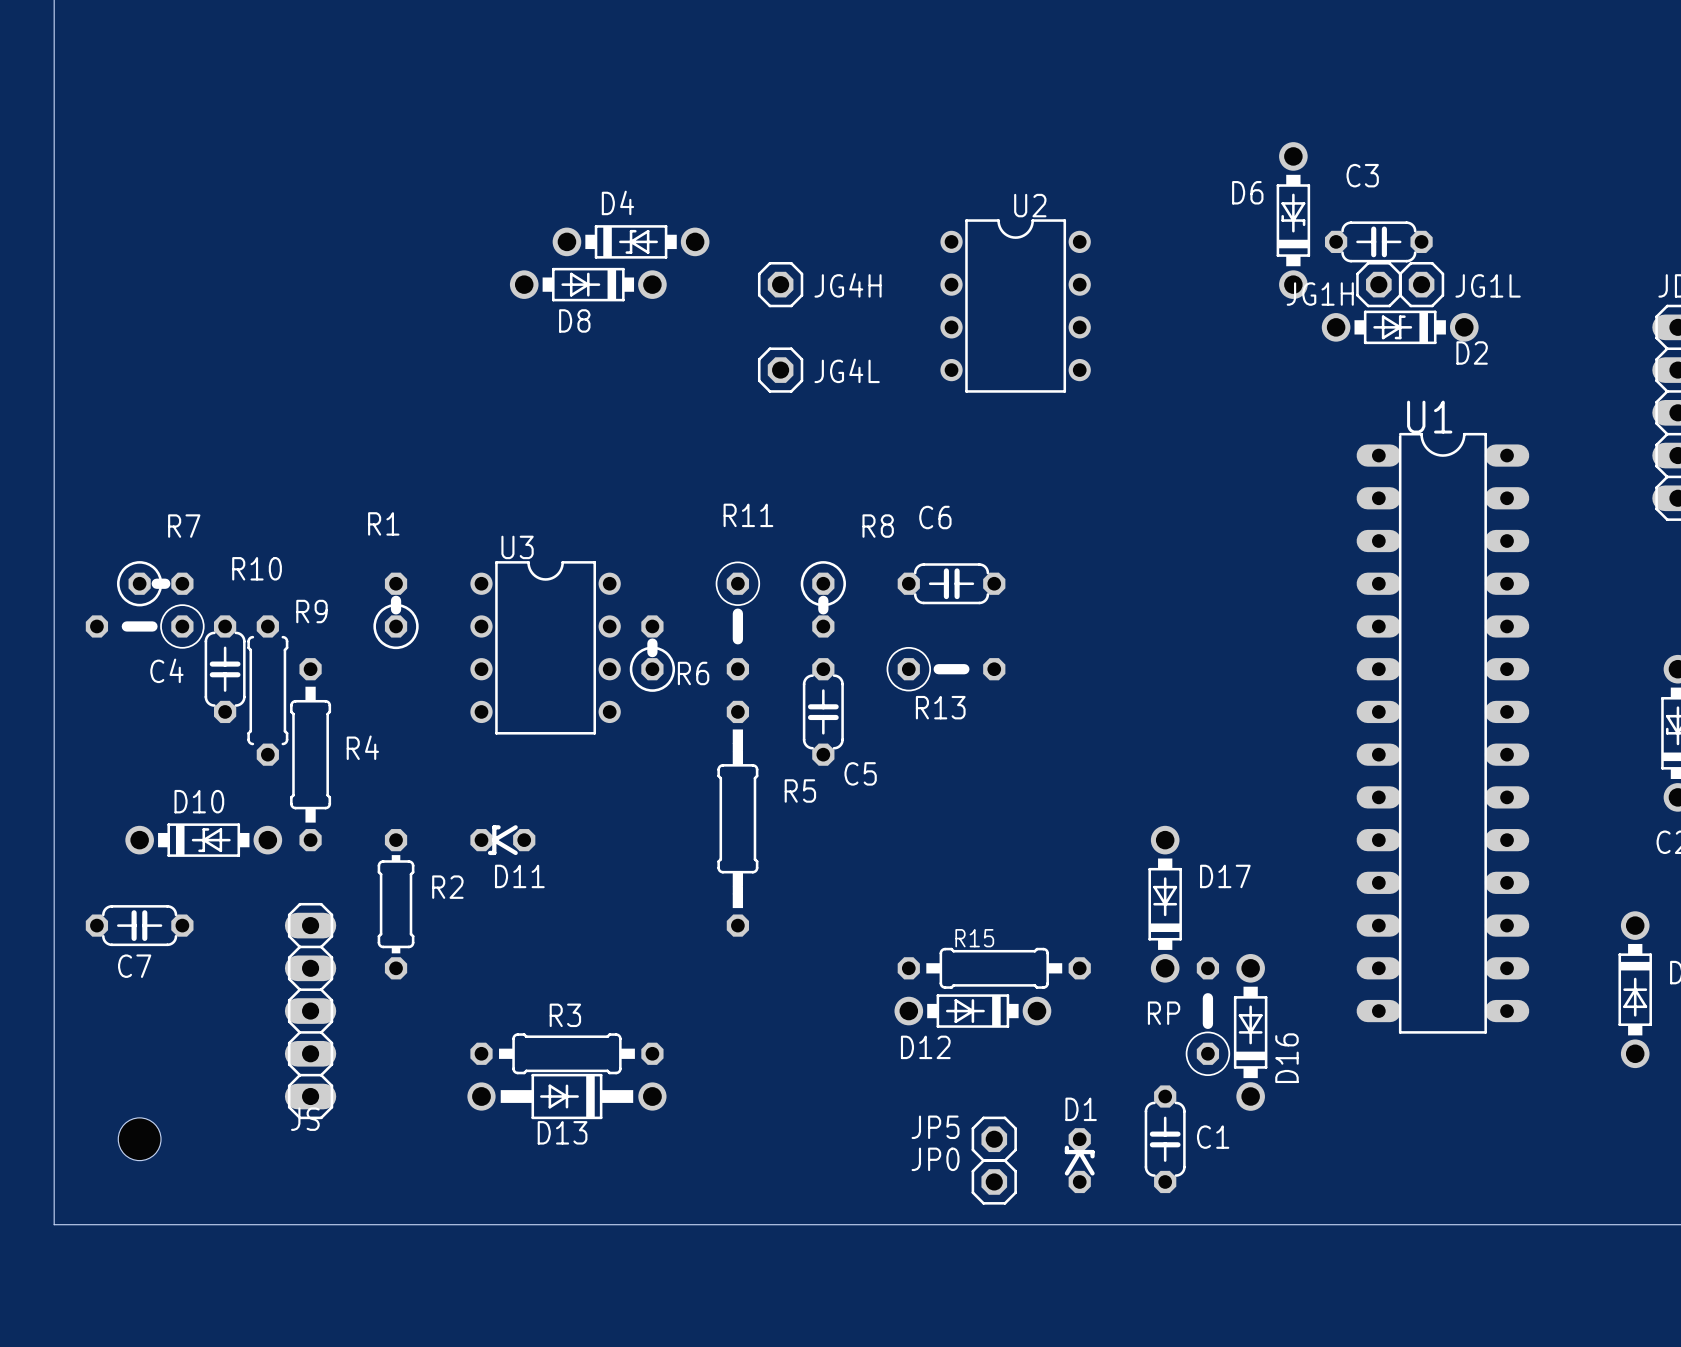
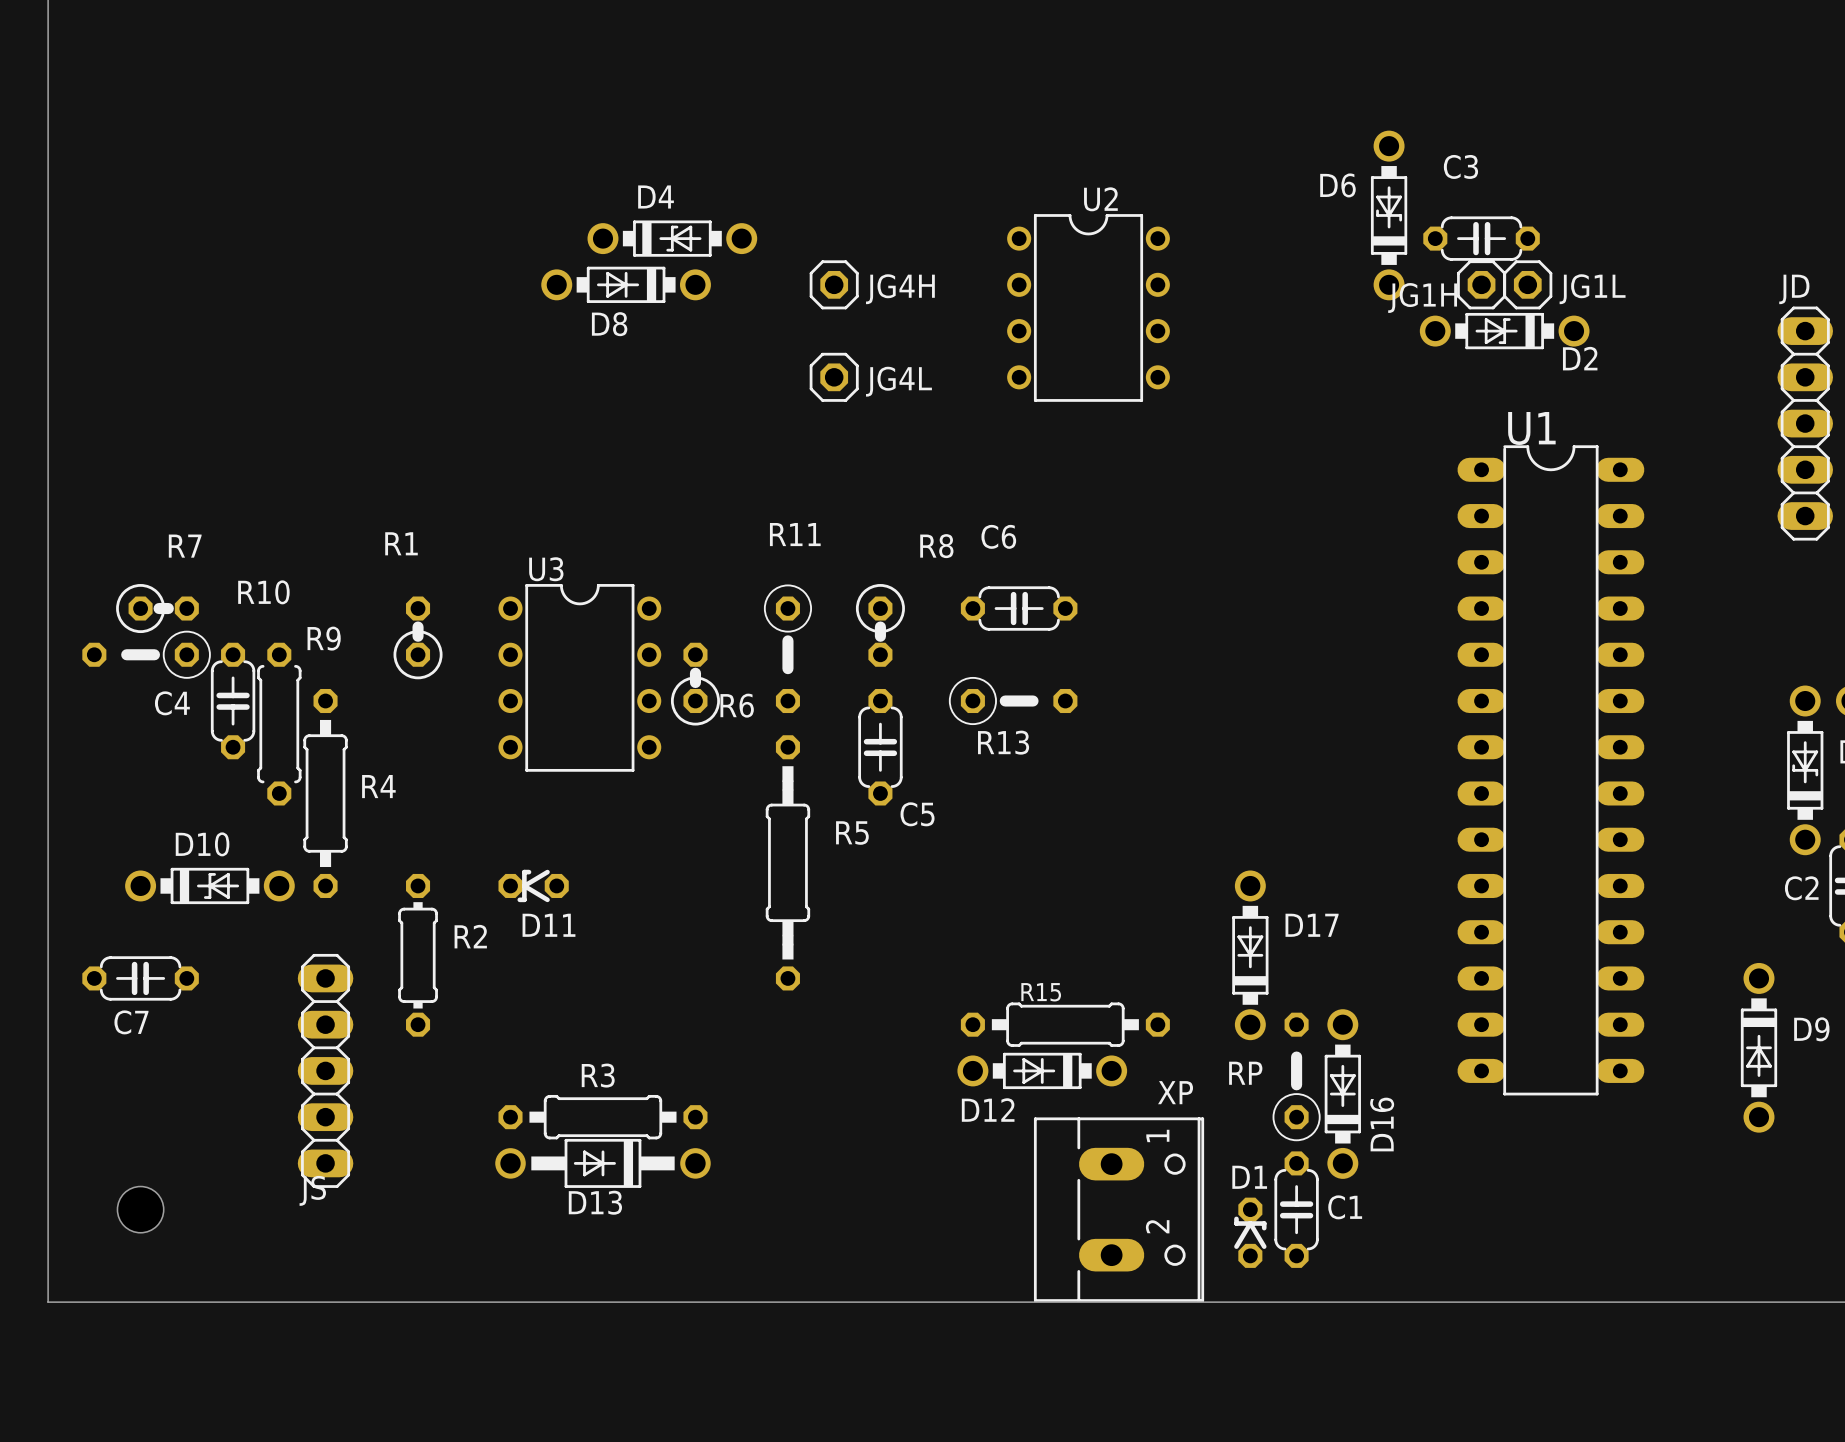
JP5: (994, 1139) -> none
XP: none -> (1119, 1209)
C1 position: (1165, 1139) -> (1296, 1209)
D1 position: (1079, 1160) -> (1250, 1232)
JP0: (994, 1181) -> none

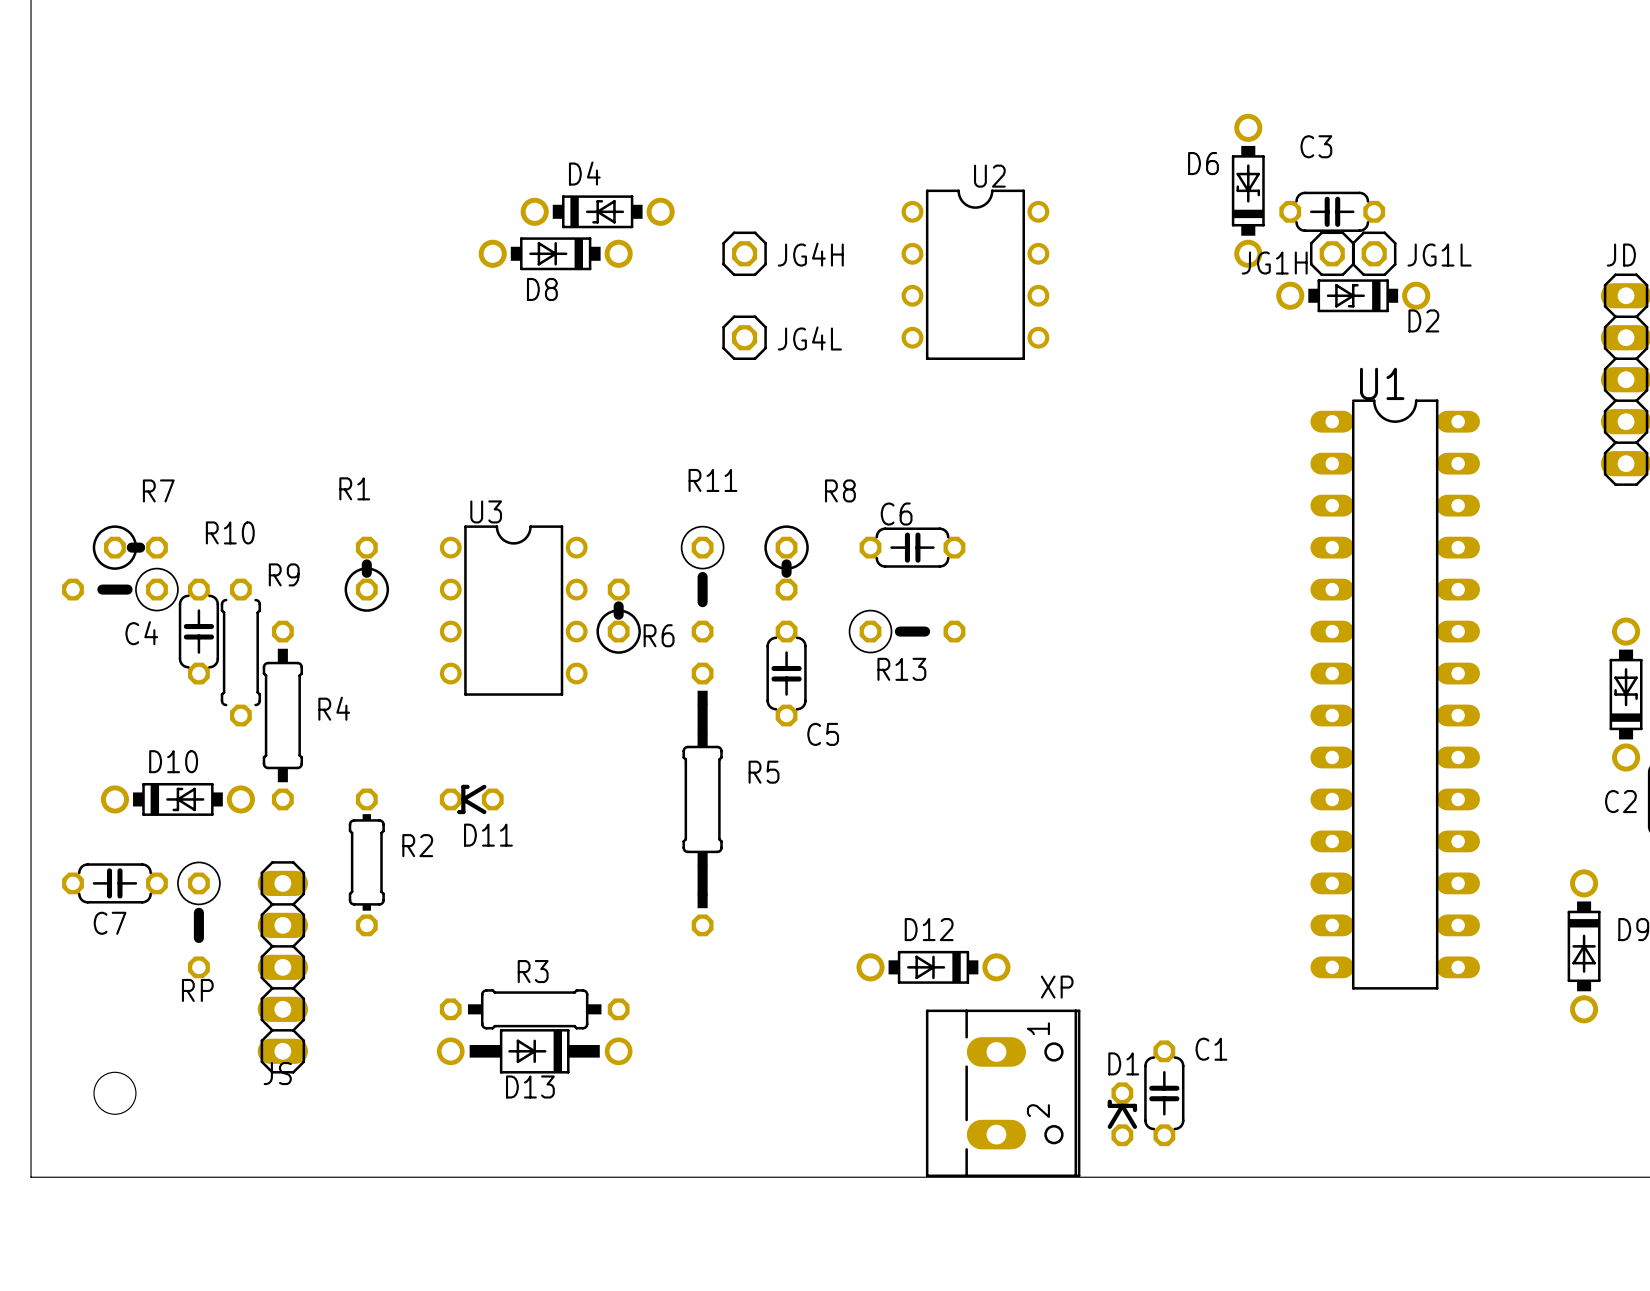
C6 name position: C6 (998, 536) -> C6 (896, 514)
R5 footprint: [765, 735, 811, 991] -> [682, 662, 723, 937]
D17: (1250, 955) -> none
RP: none -> (198, 919)
R15: (1065, 1024) -> none
RP: (1296, 1076) -> none
D16: (1342, 1094) -> none
D12 name position: D12 (988, 1110) -> D12 (929, 929)
C1 name position: C1 (1345, 1207) -> C1 (1211, 1049)

